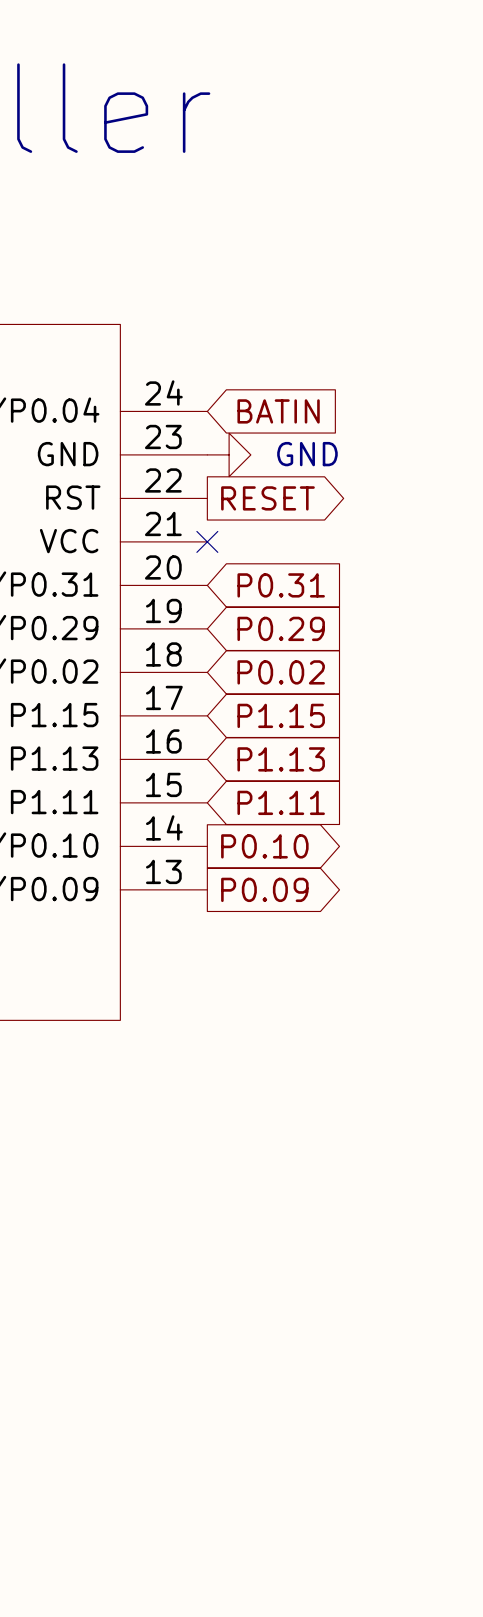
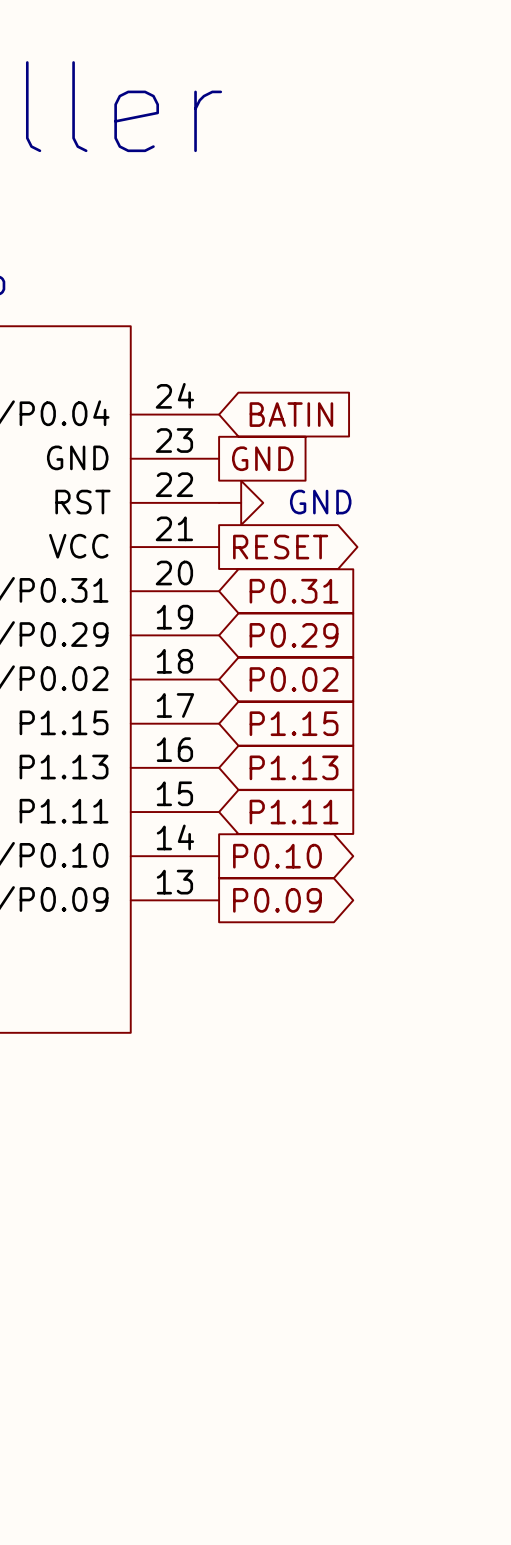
power symbol position: GND (229, 454) -> GND (241, 502)
global label: none -> GND (262, 458)
global label position: RESET (267, 498) -> RESET (280, 547)
no-connect mark: (207, 541) -> none

